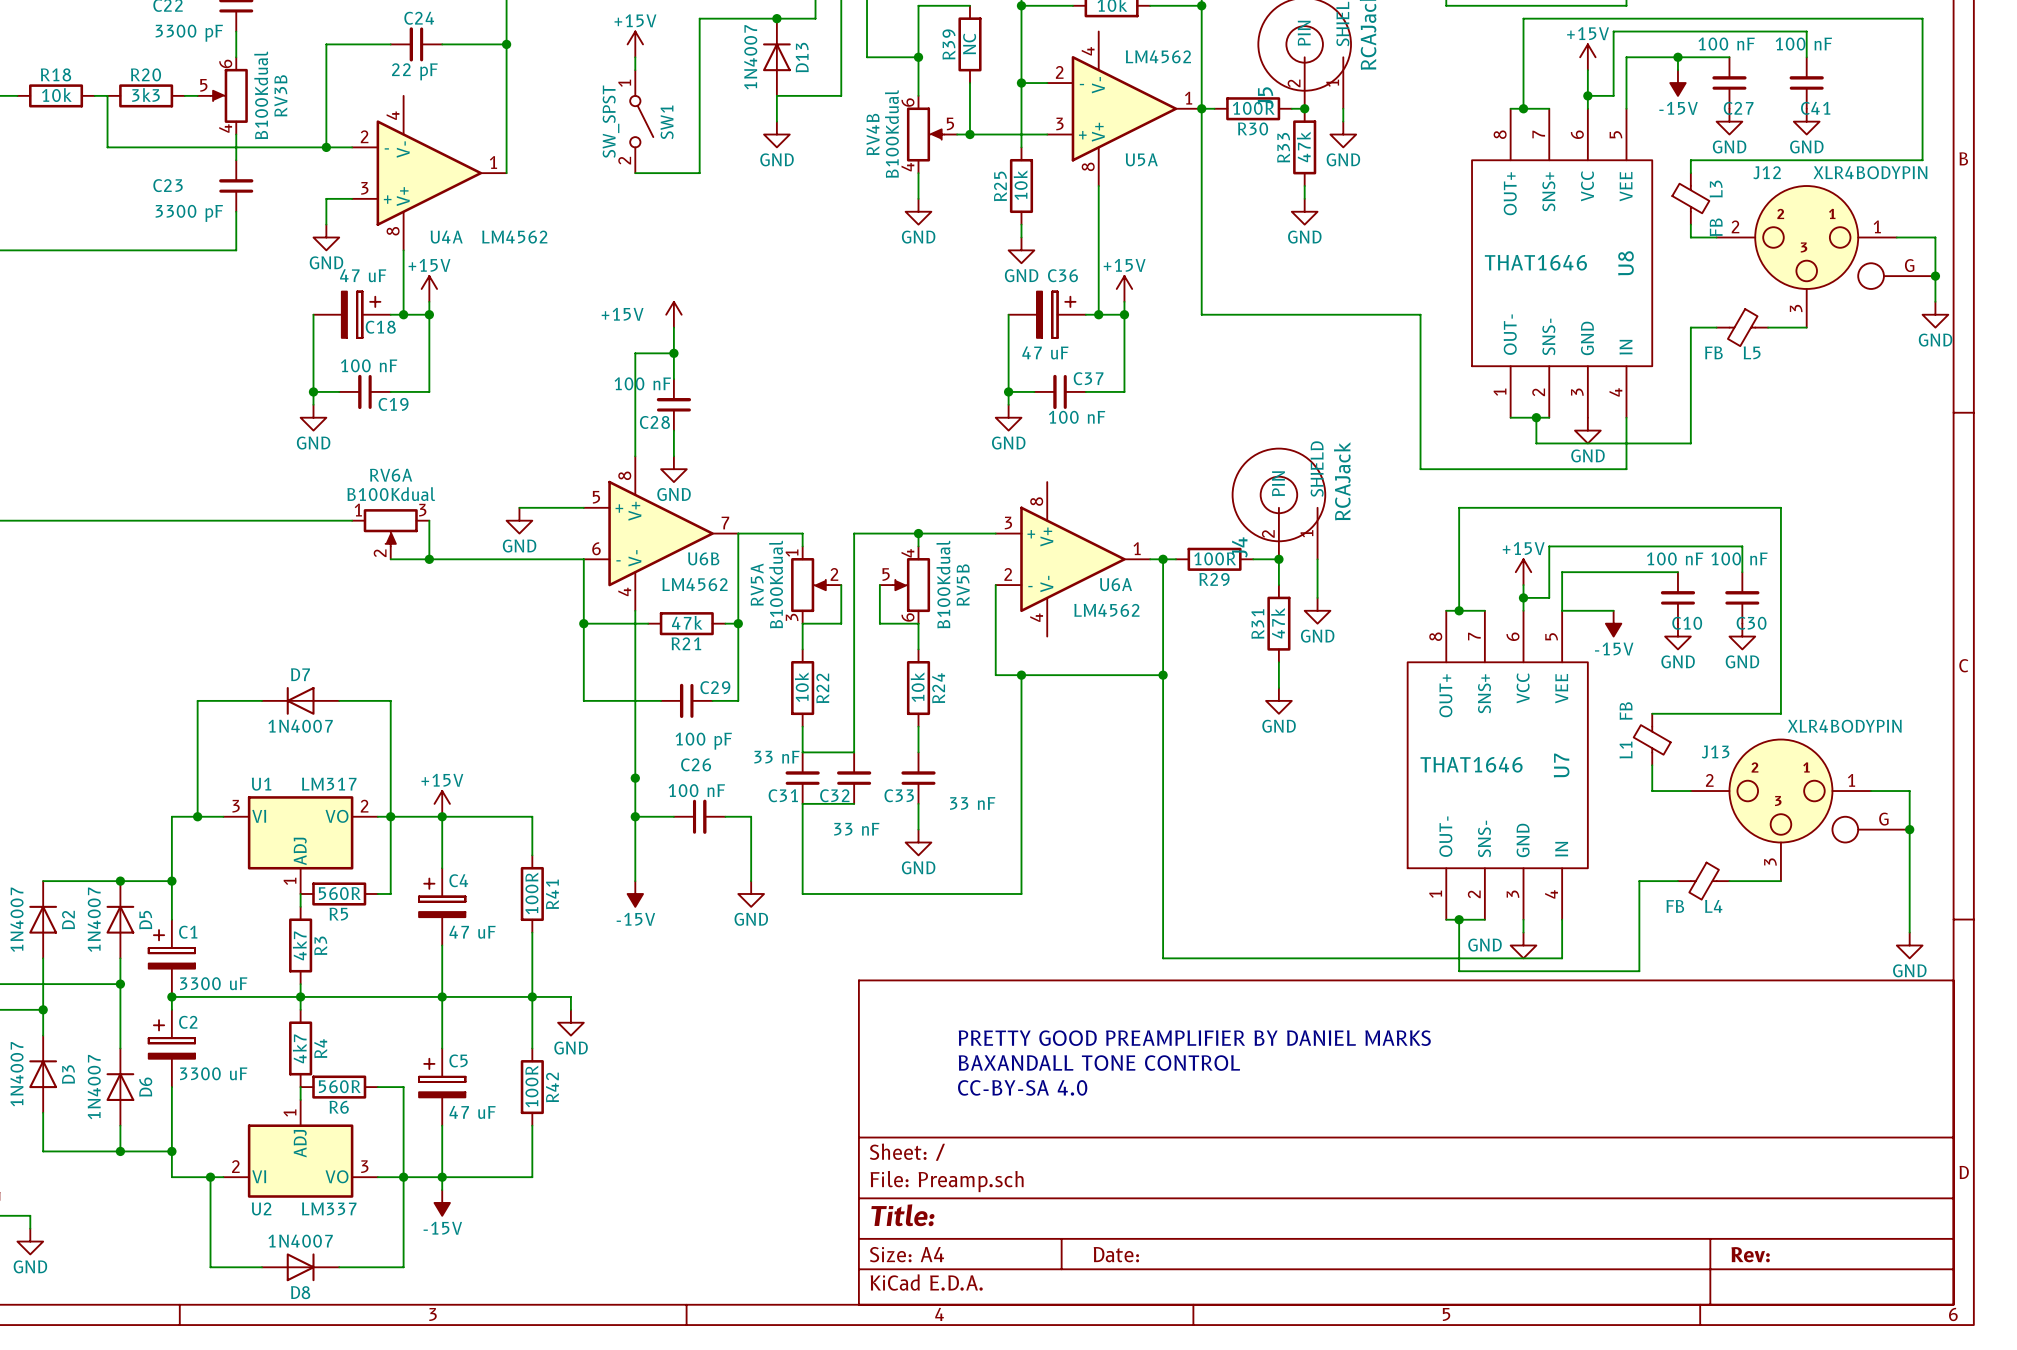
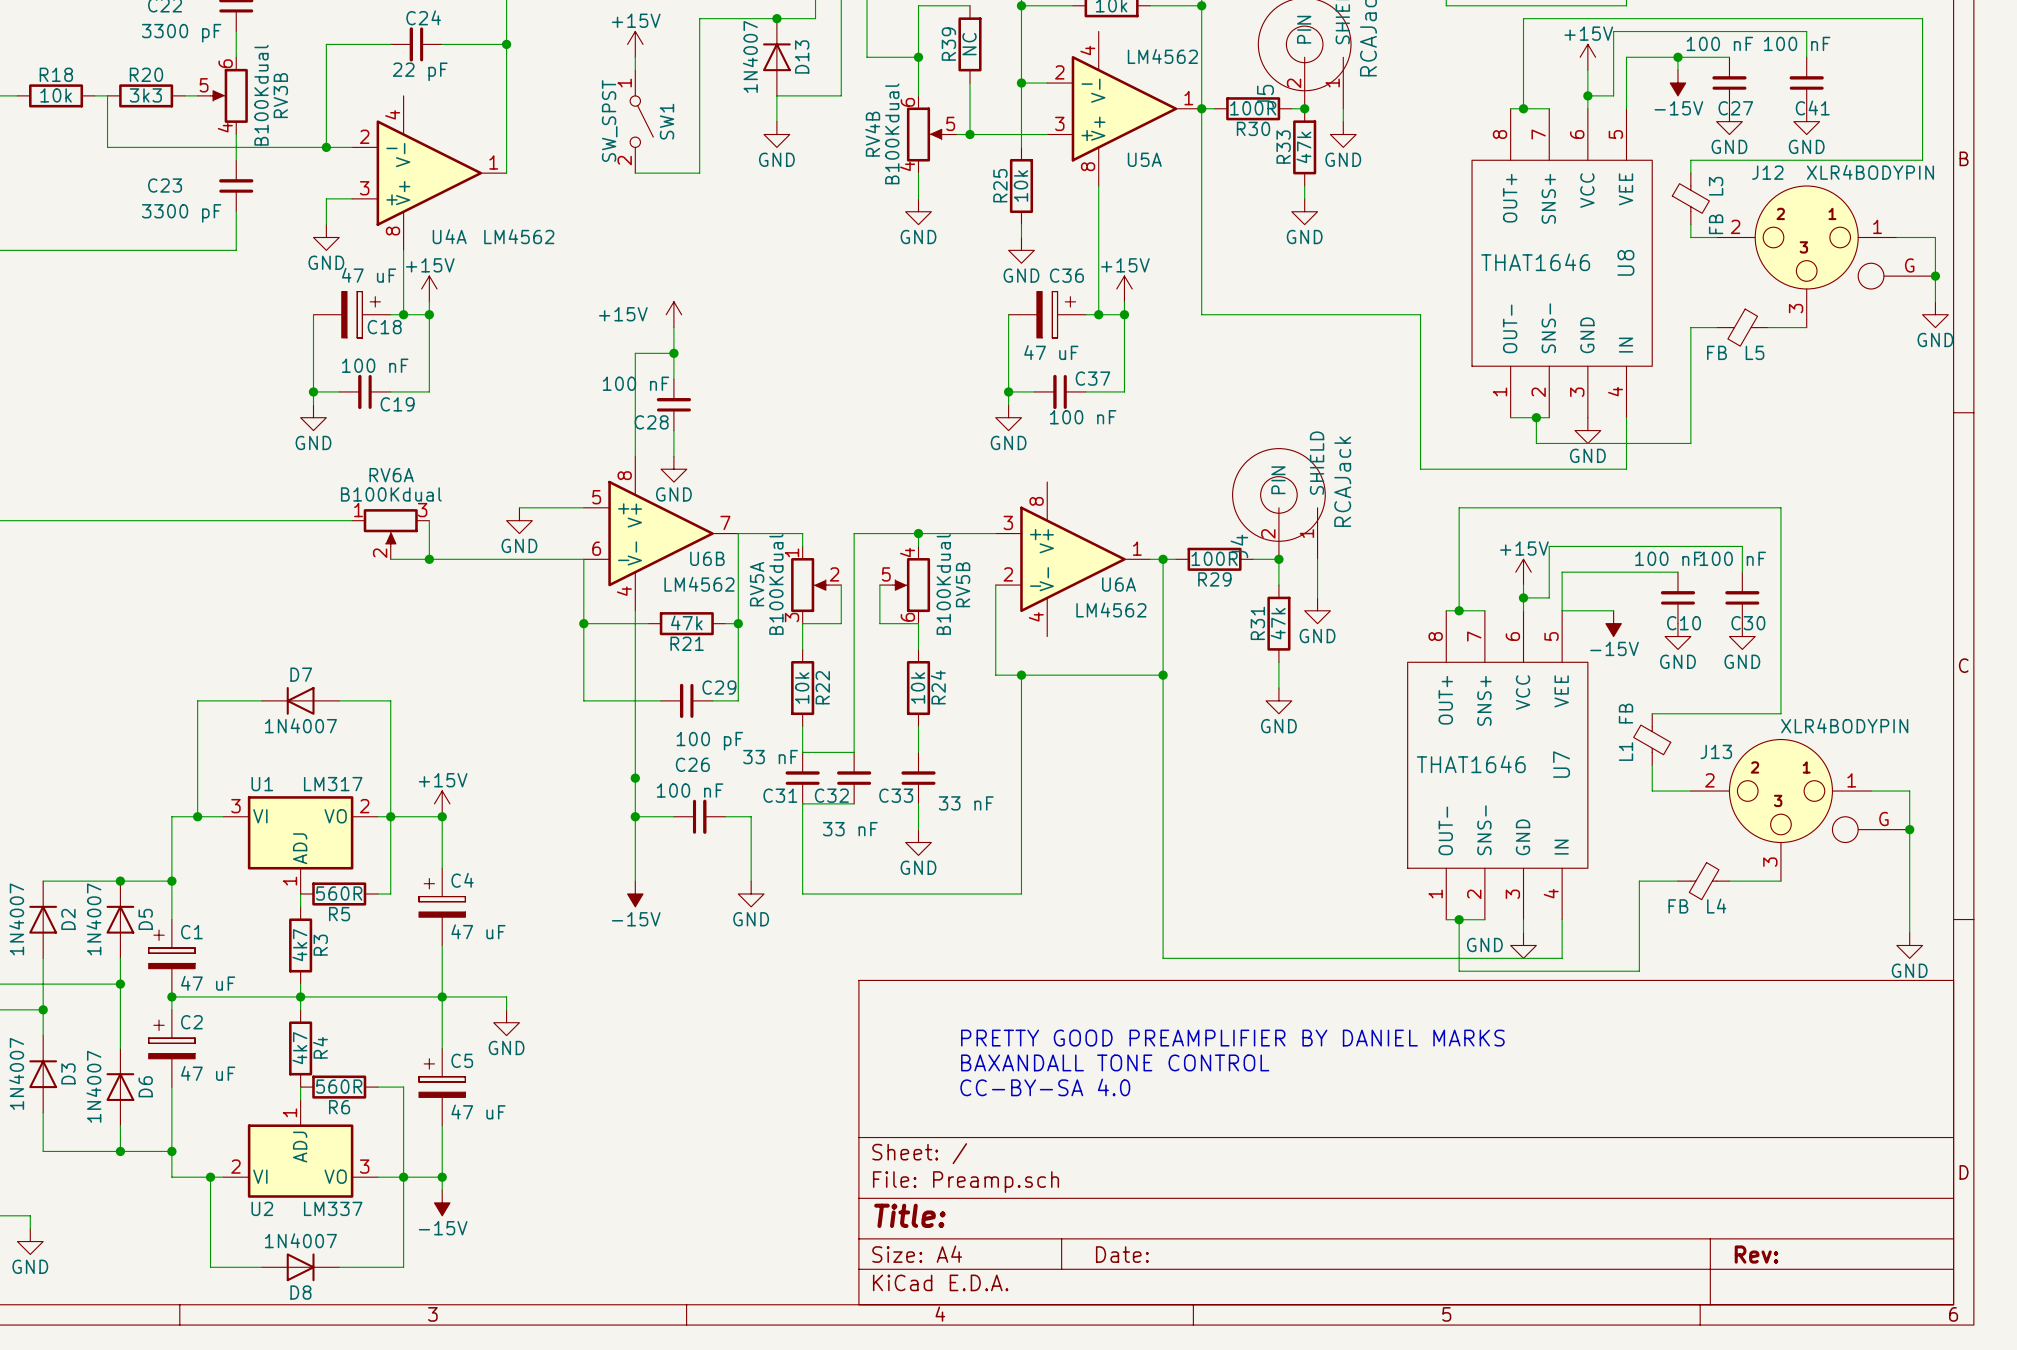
wire: (442, 816) (532, 816) (532, 855) -> none
R41: 100R (532, 893) -> none
wire: (532, 932) (532, 1048) -> none
C1 value: 3300 uF (213, 983) -> 47 uF (208, 983)
wire: (506, 996) (570, 996) (570, 1009) -> (506, 996) (506, 1009)
junction: (532, 996) -> none
power symbol position: GND (570, 1022) -> GND (506, 1022)
C2 value: 3300 uF (213, 1073) -> 47 uF (208, 1073)
R42: 100R (532, 1087) -> none
wire: (532, 1125) (532, 1177) (442, 1177) -> none

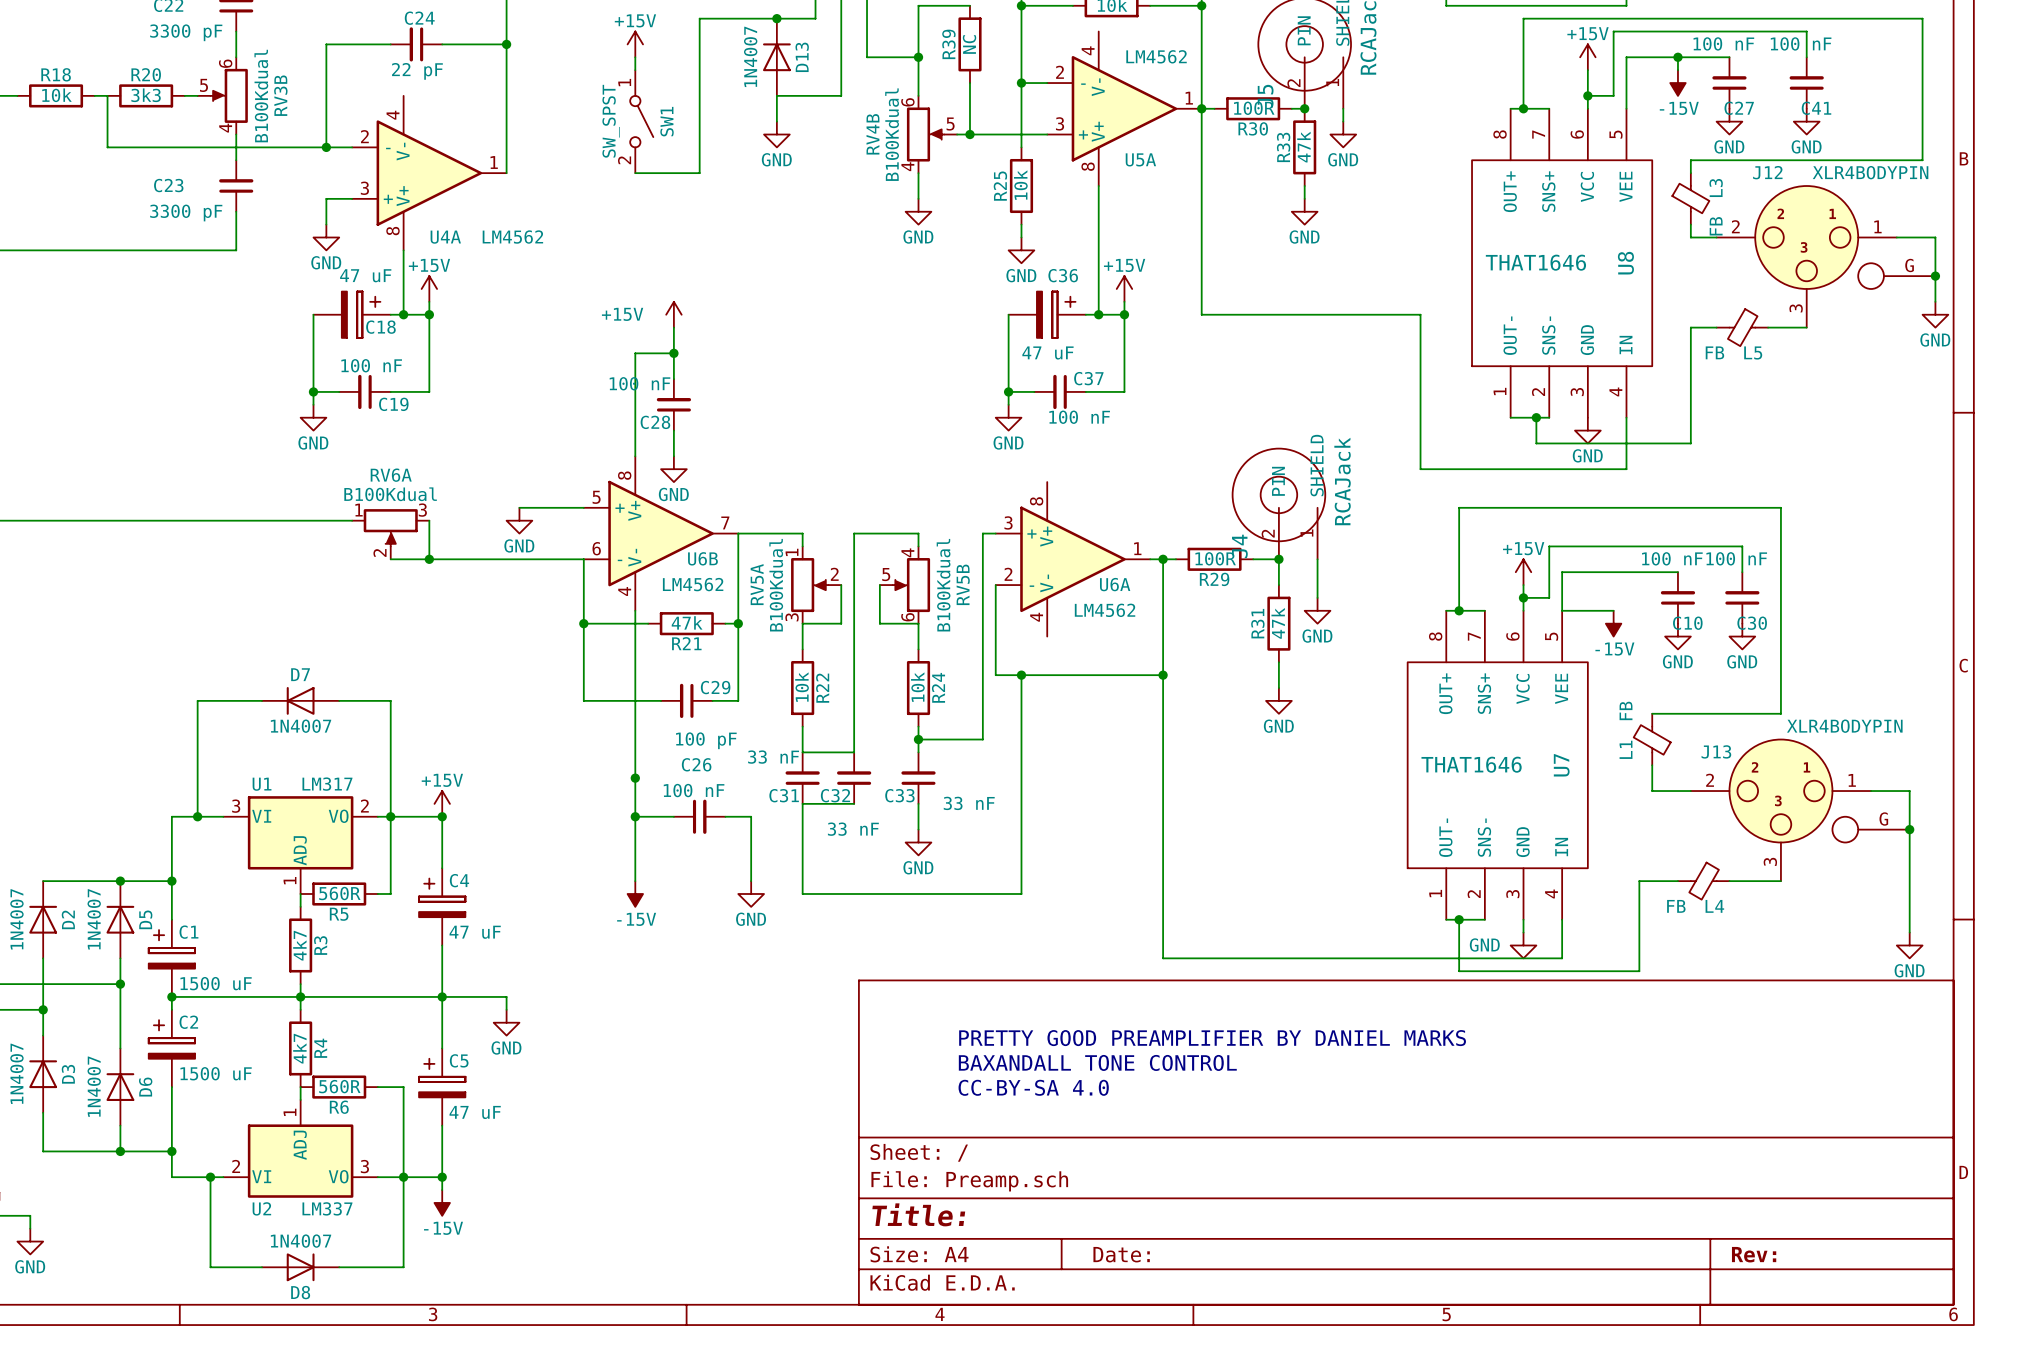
wire: (918, 533) (982, 533) -> (918, 739) (982, 739) (982, 533)
junction: (918, 533) -> none
junction: none -> (918, 739)
C1 value: 47 uF (208, 983) -> 1500 uF (216, 983)
C2 value: 47 uF (208, 1073) -> 1500 uF (216, 1073)

